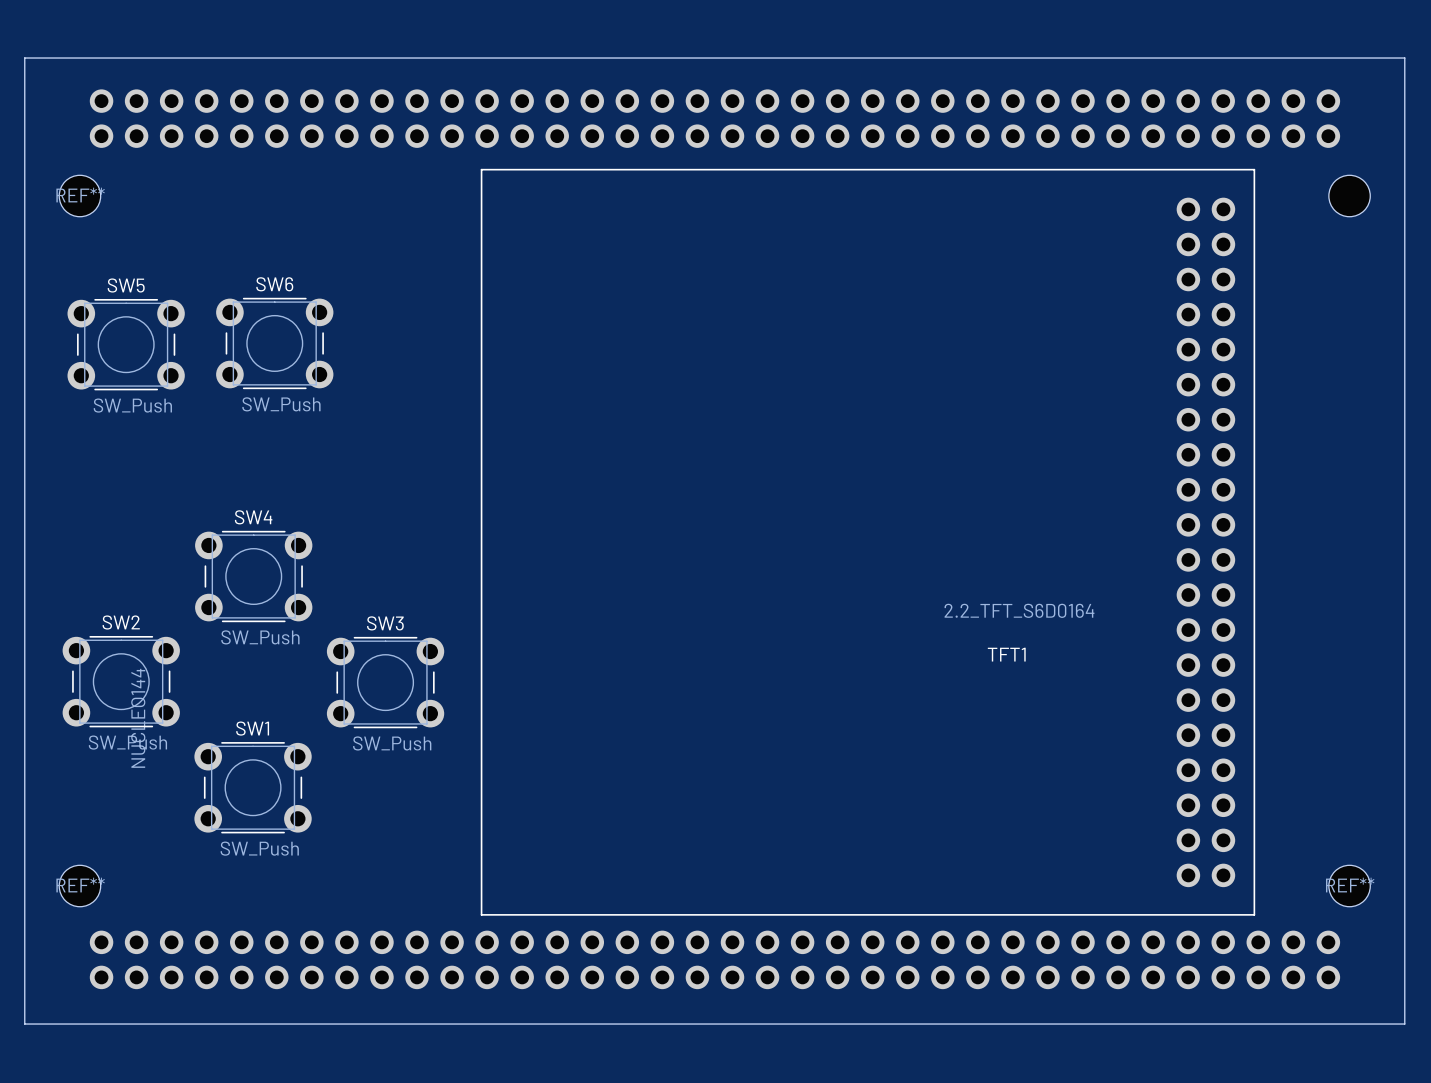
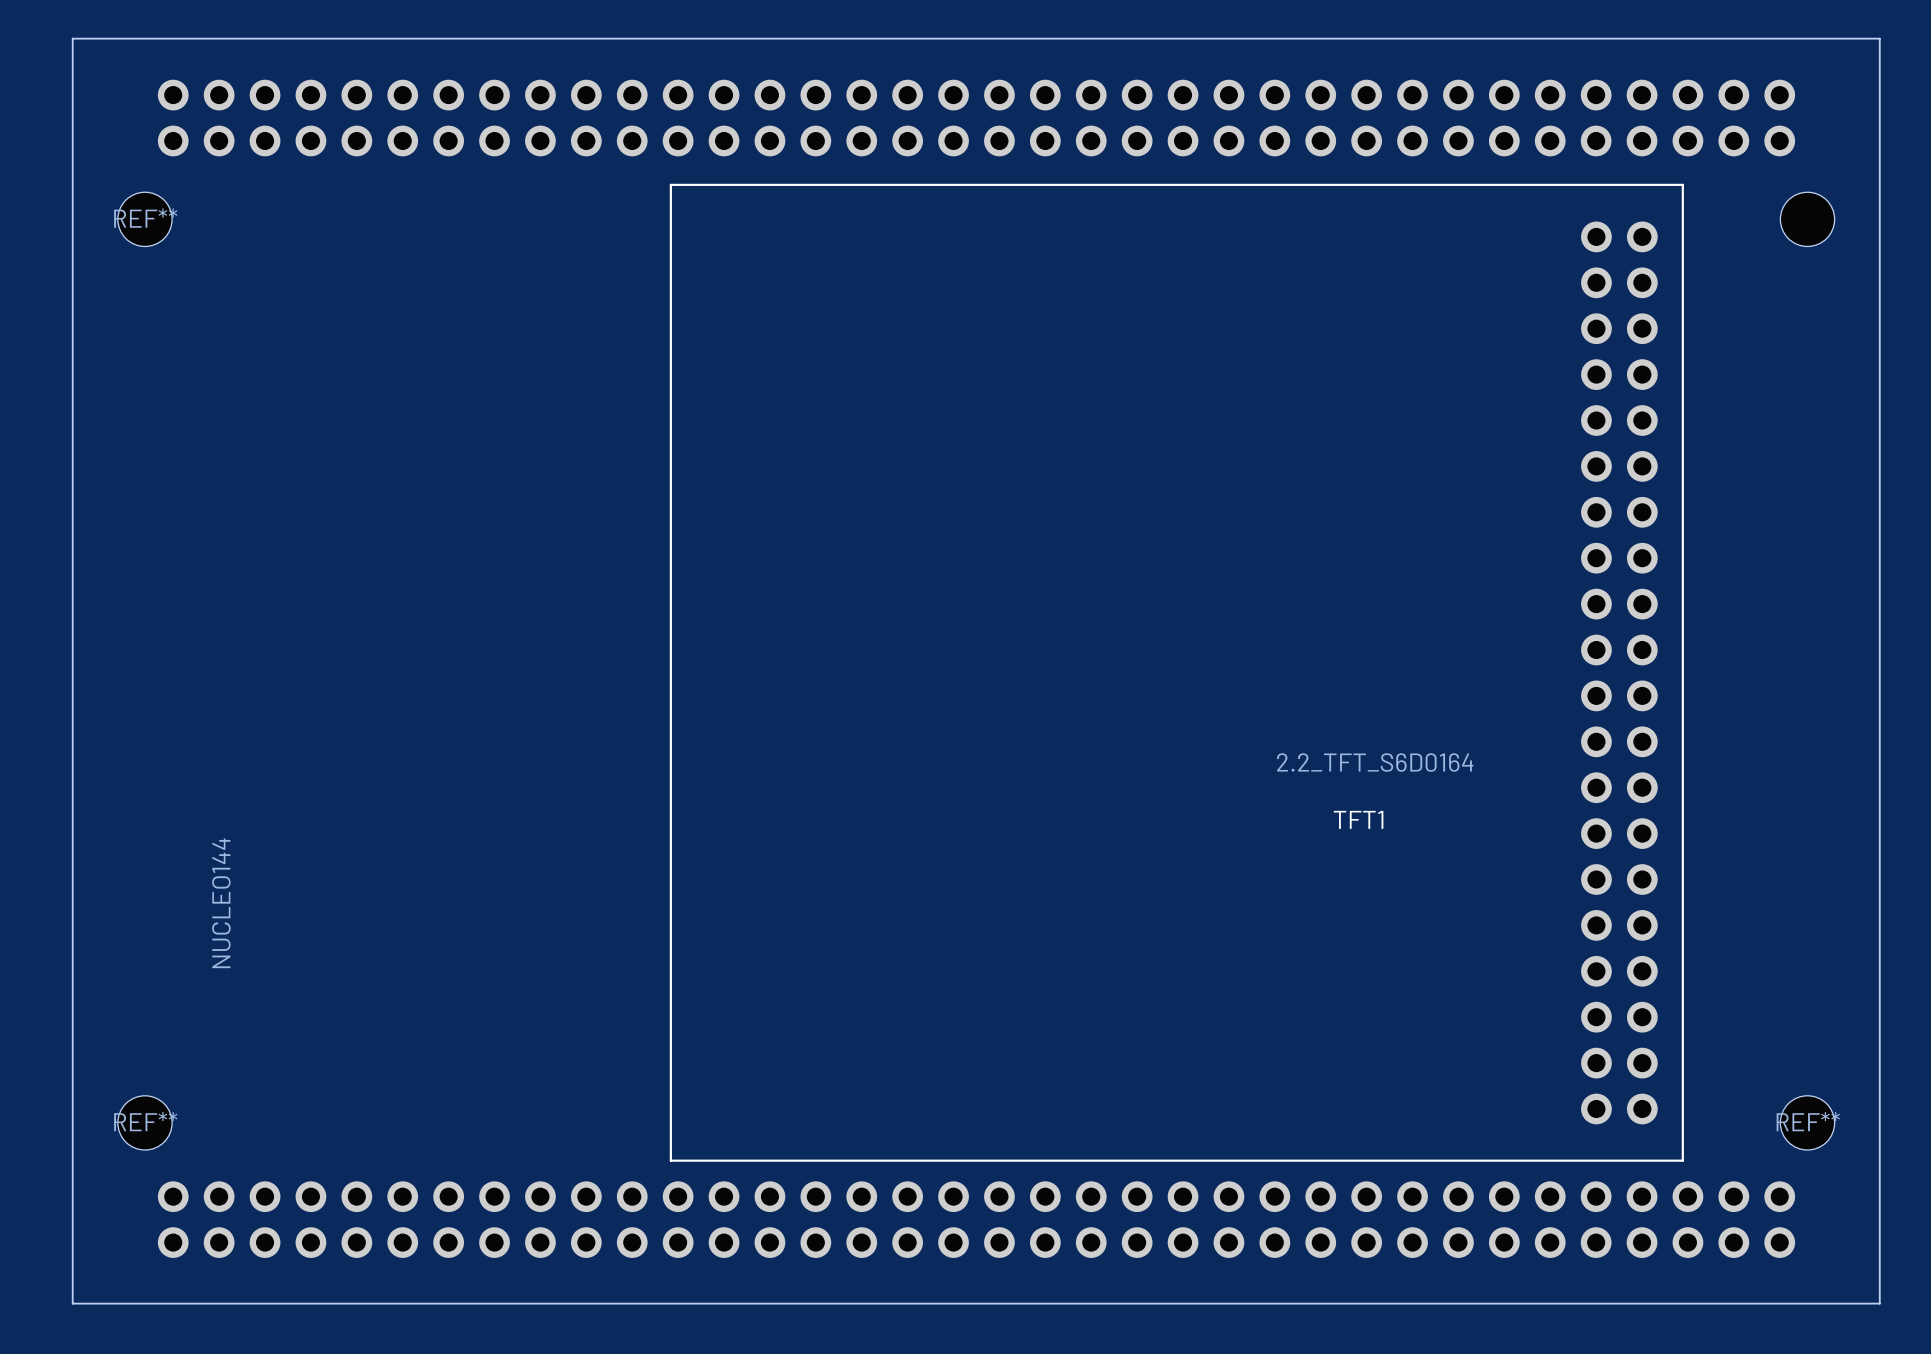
SW6: SW_Push (274, 343) -> none
SW5: SW_Push (126, 344) -> none
SW4: SW_Push (253, 576) -> none
SW2: SW_Push (121, 681) -> none
SW3: SW_Push (385, 682) -> none
SW1: SW_Push (253, 787) -> none

